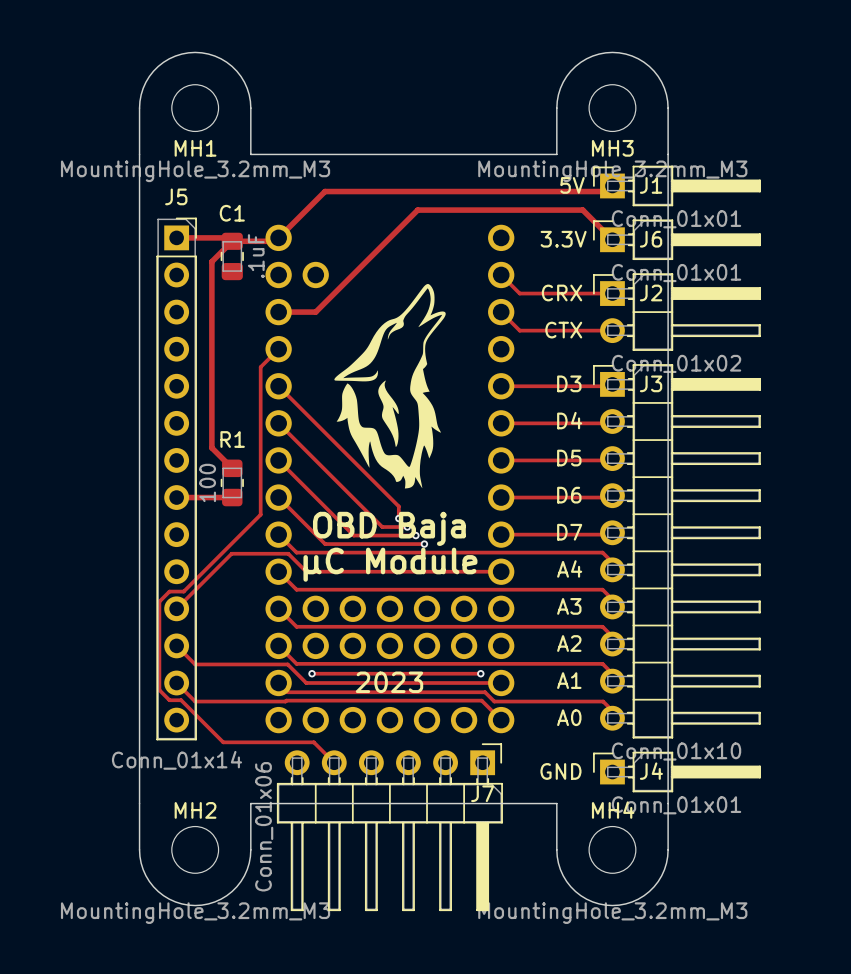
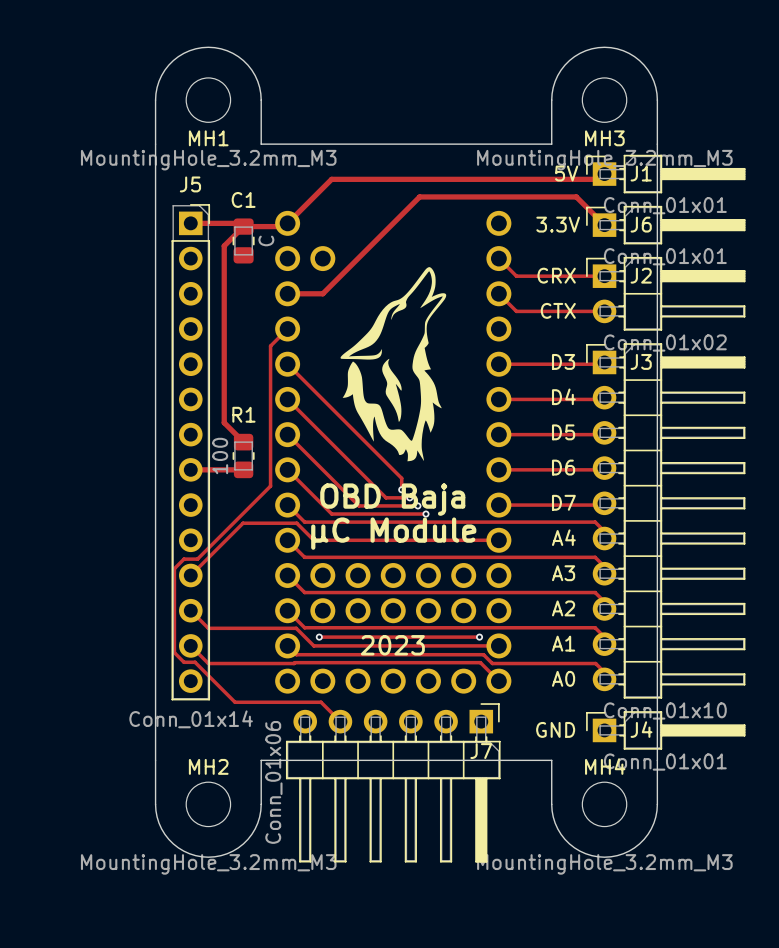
C1 value: .1uF (256, 256) -> C (266, 240)

